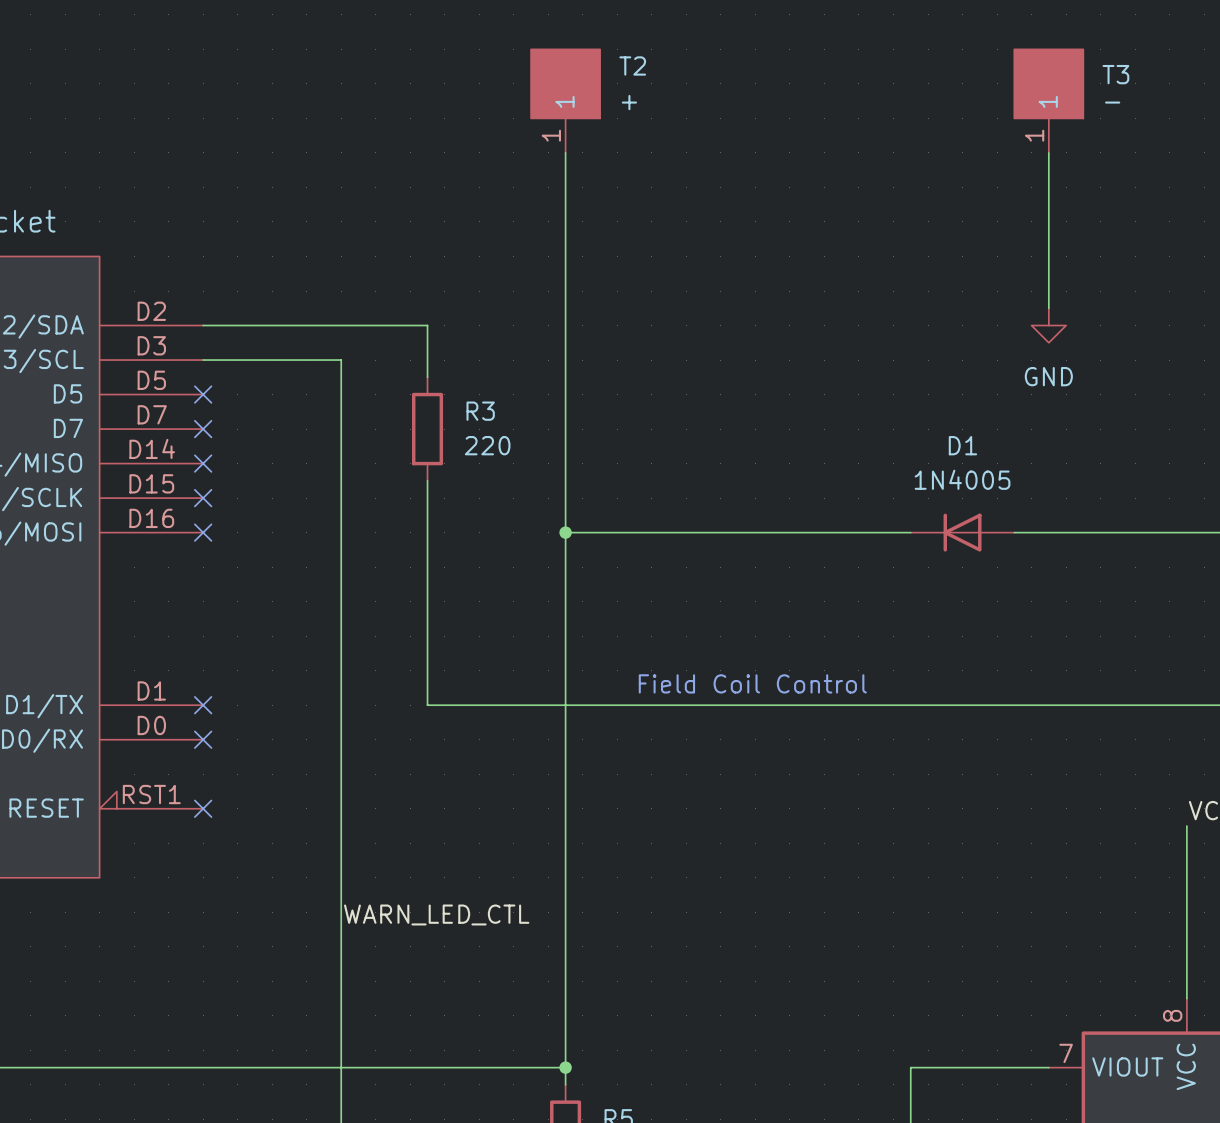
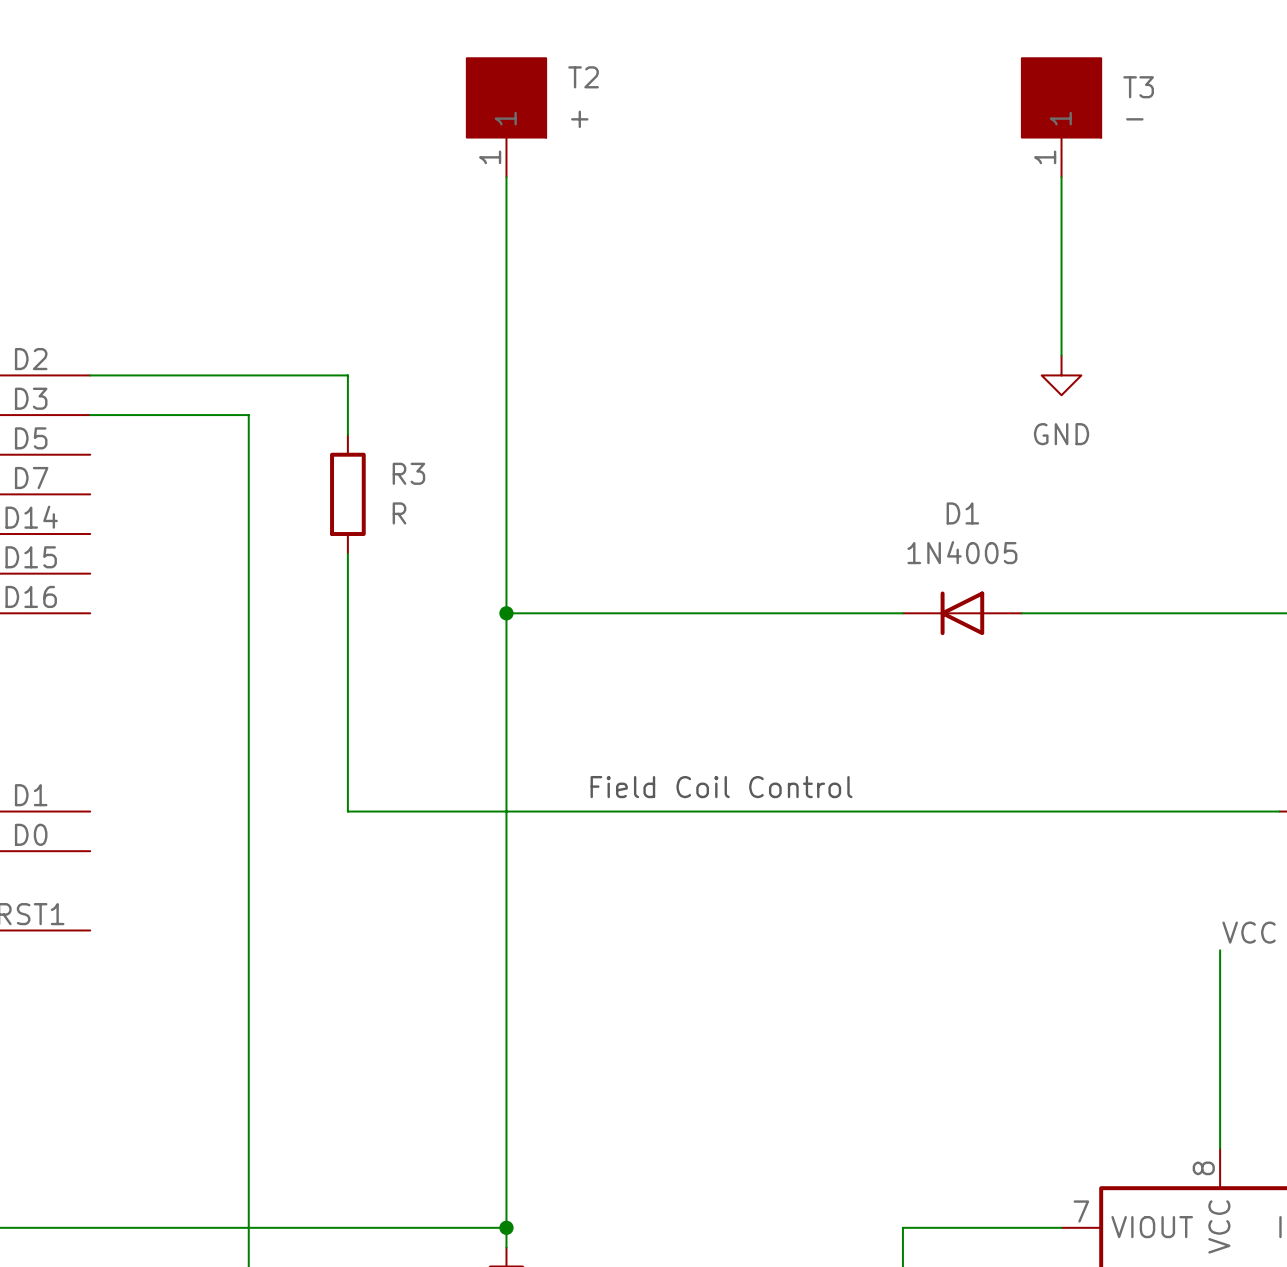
no-connect mark: (203, 394) -> none
no-connect mark: (203, 429) -> none
R3 value: 220 (487, 445) -> R (399, 513)
no-connect mark: (203, 463) -> none
no-connect mark: (203, 498) -> none
no-connect mark: (203, 532) -> none
no-connect mark: (203, 705) -> none
no-connect mark: (203, 739) -> none
no-connect mark: (203, 808) -> none
label: WARN_LED_CTL (436, 914) -> none

